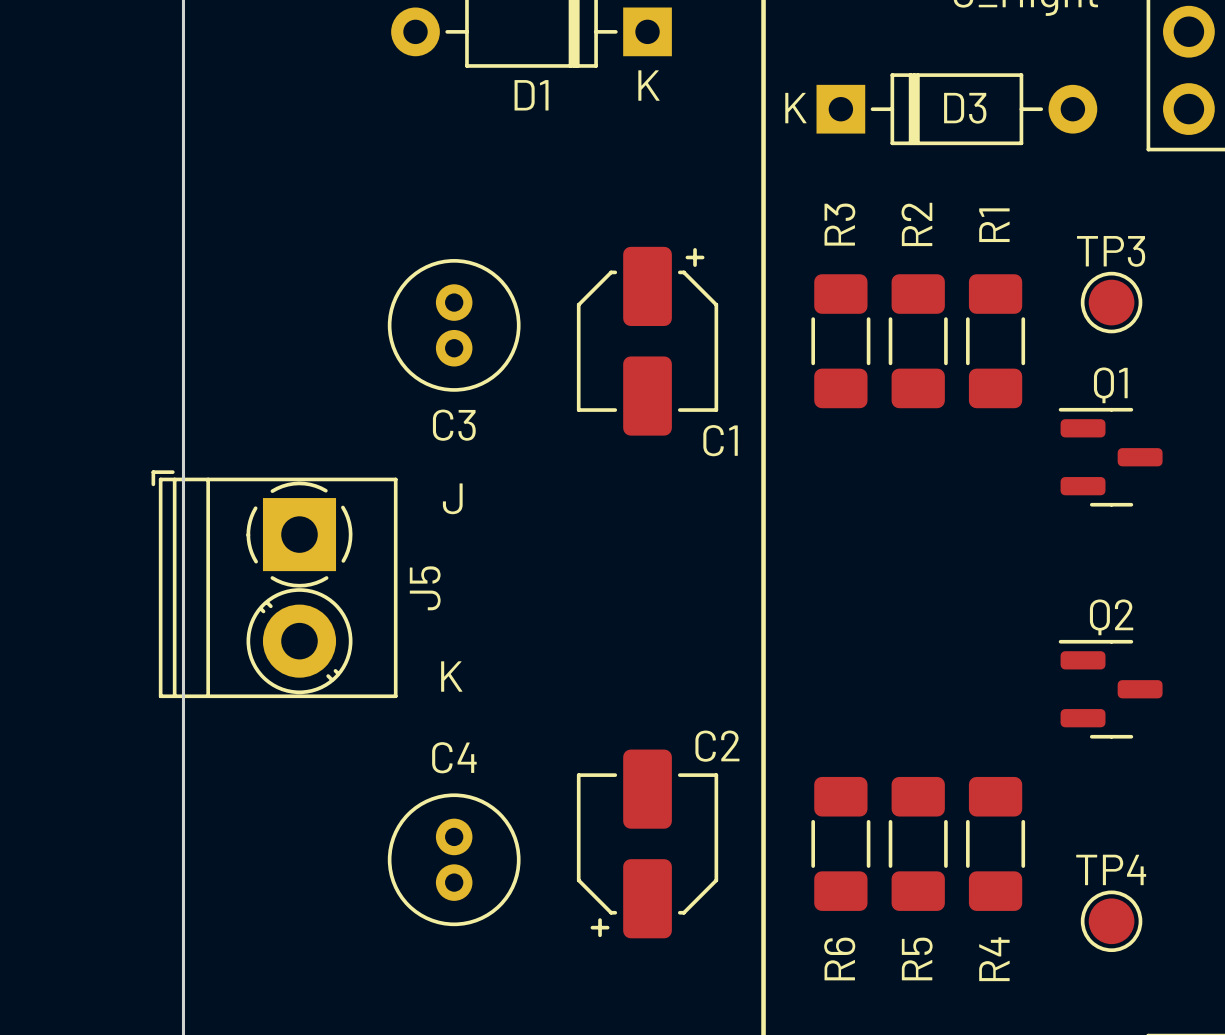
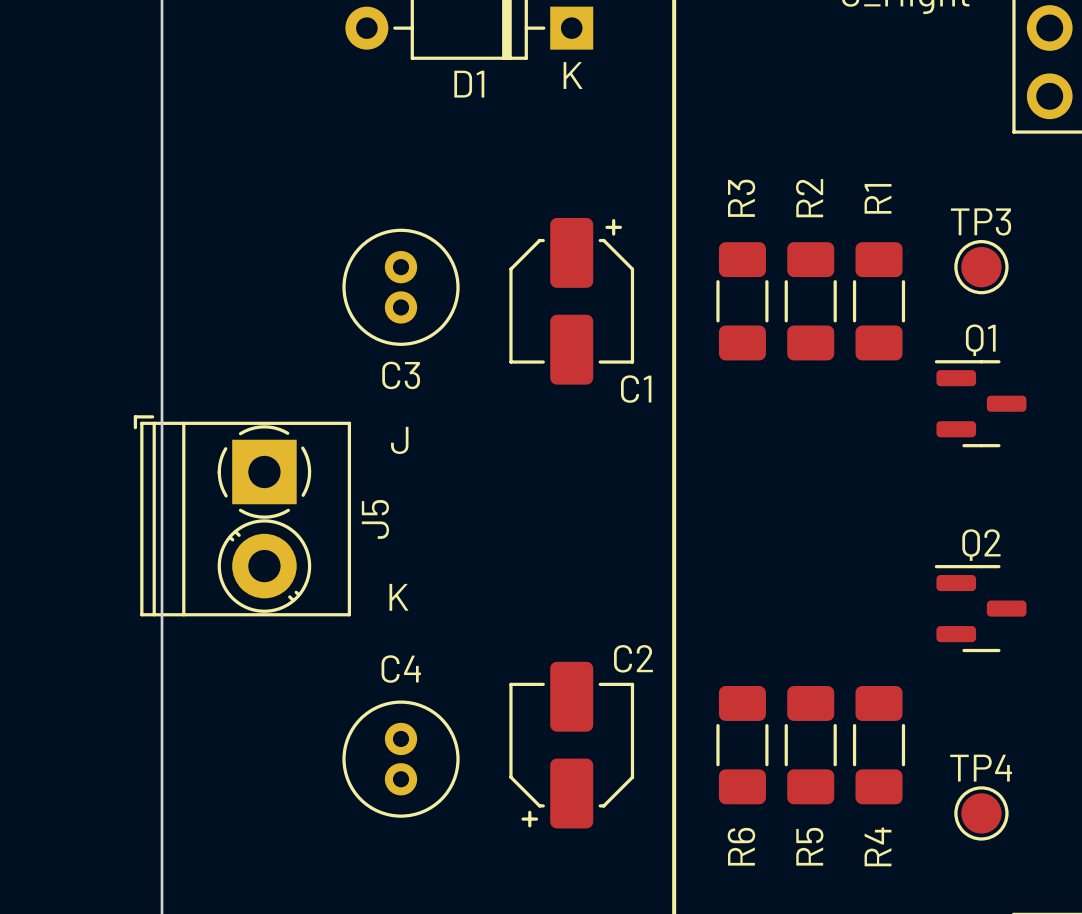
D3: (956, 109) -> none

